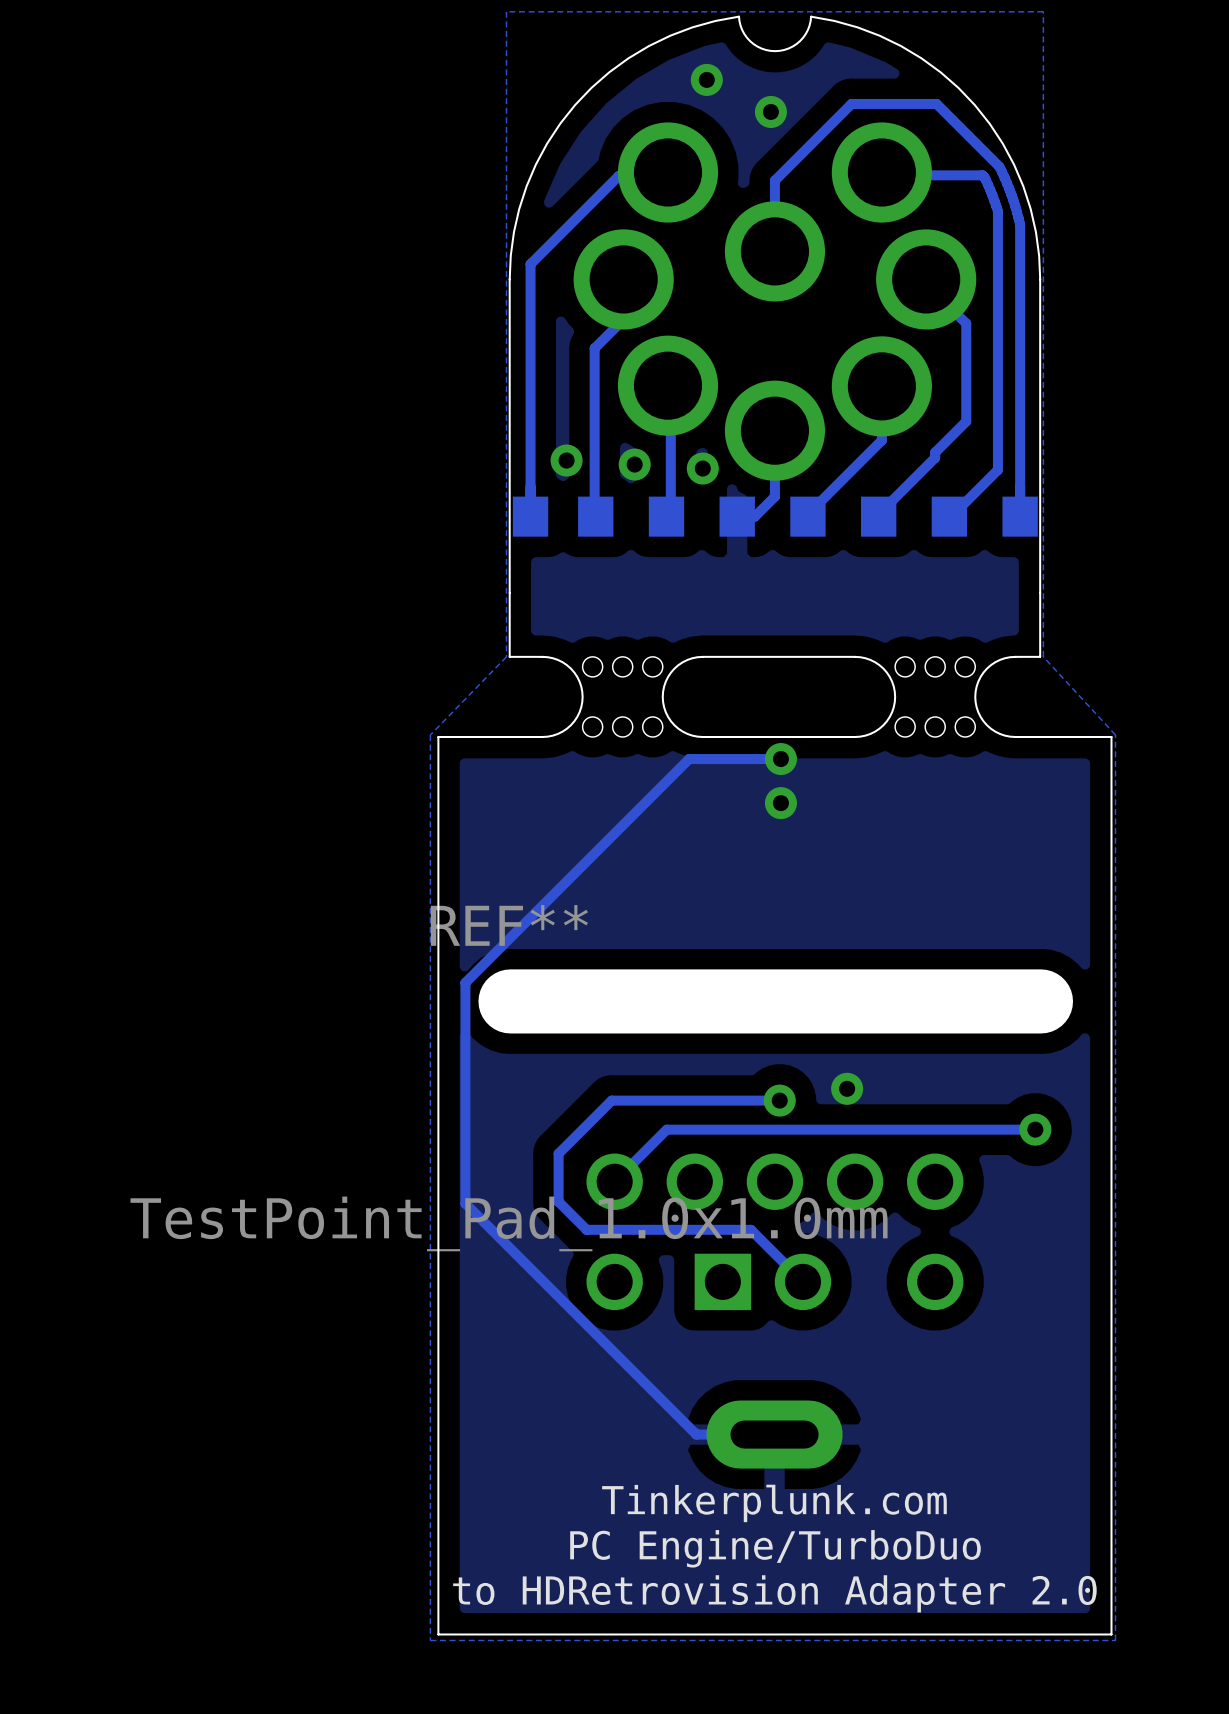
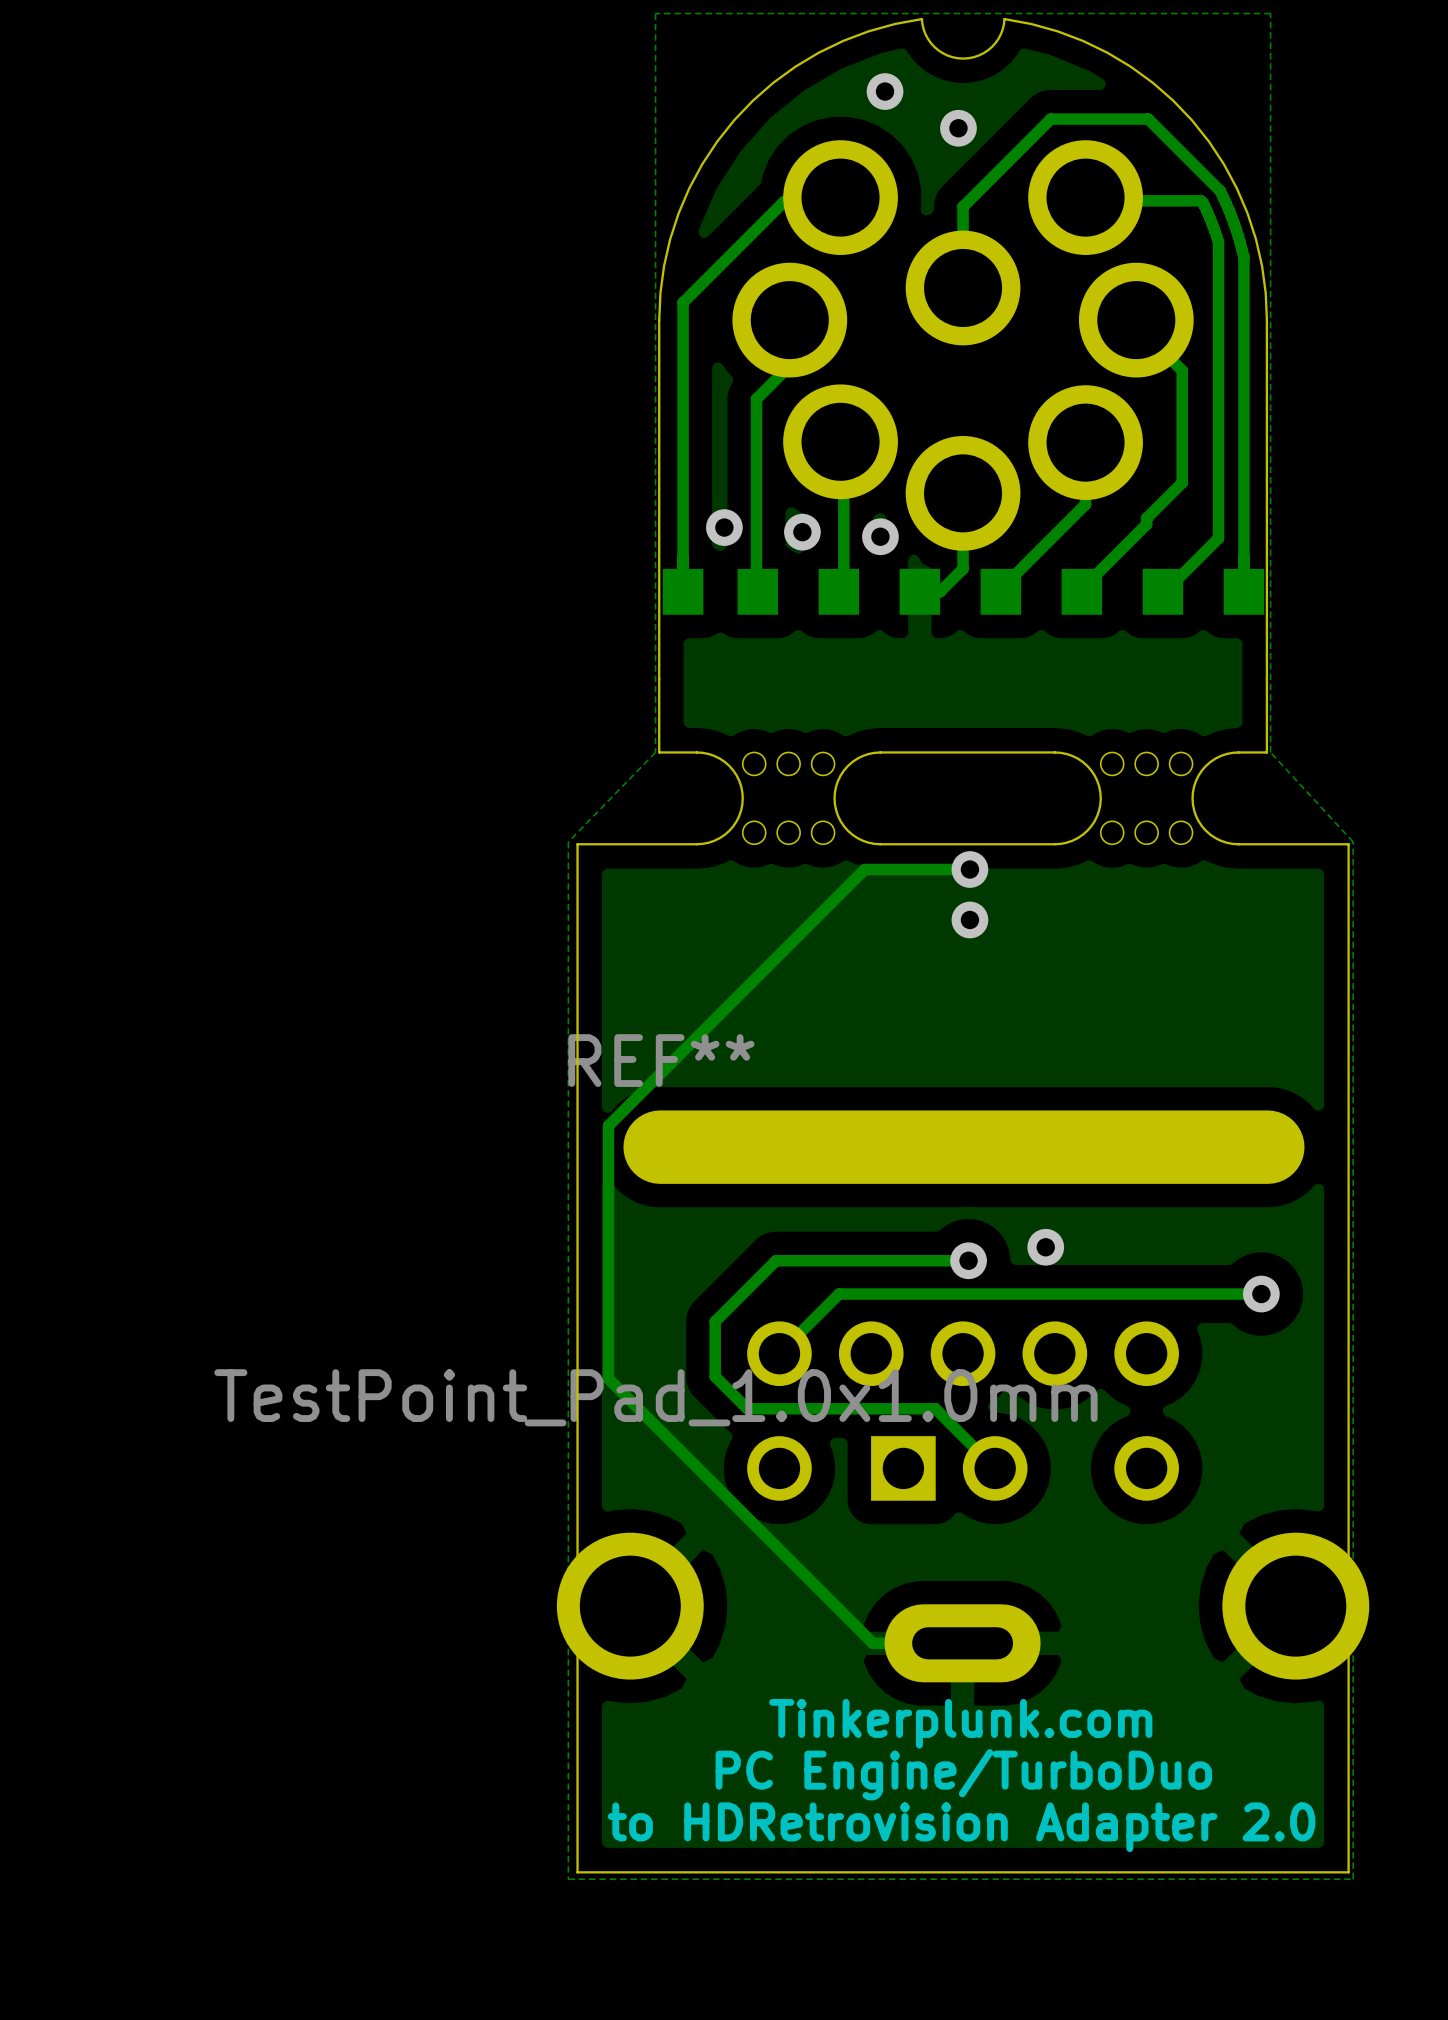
part footprint: [586, 1153, 964, 1469] -> [556, 1321, 1370, 1683]

